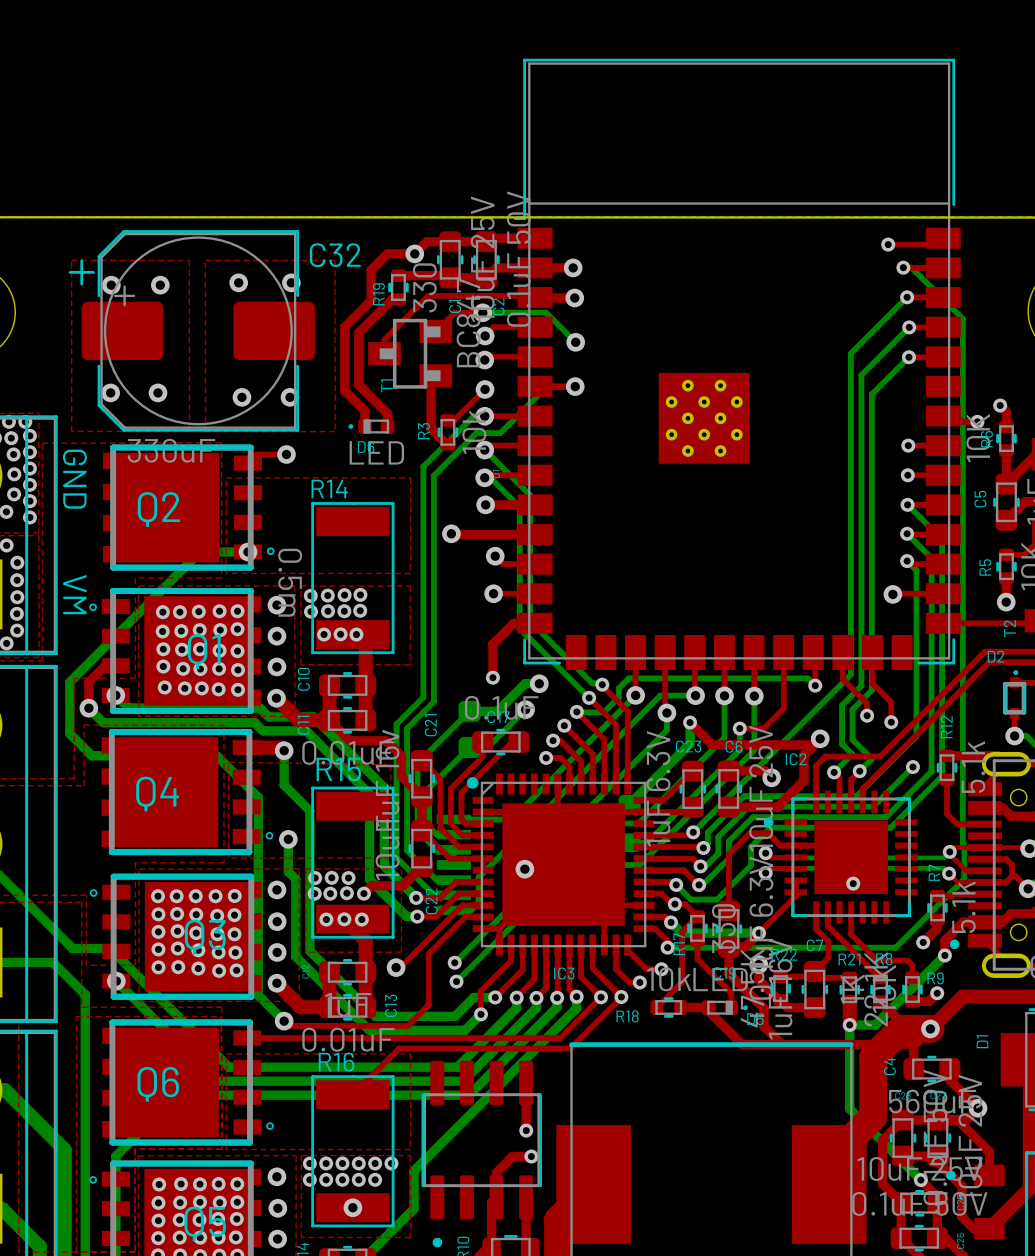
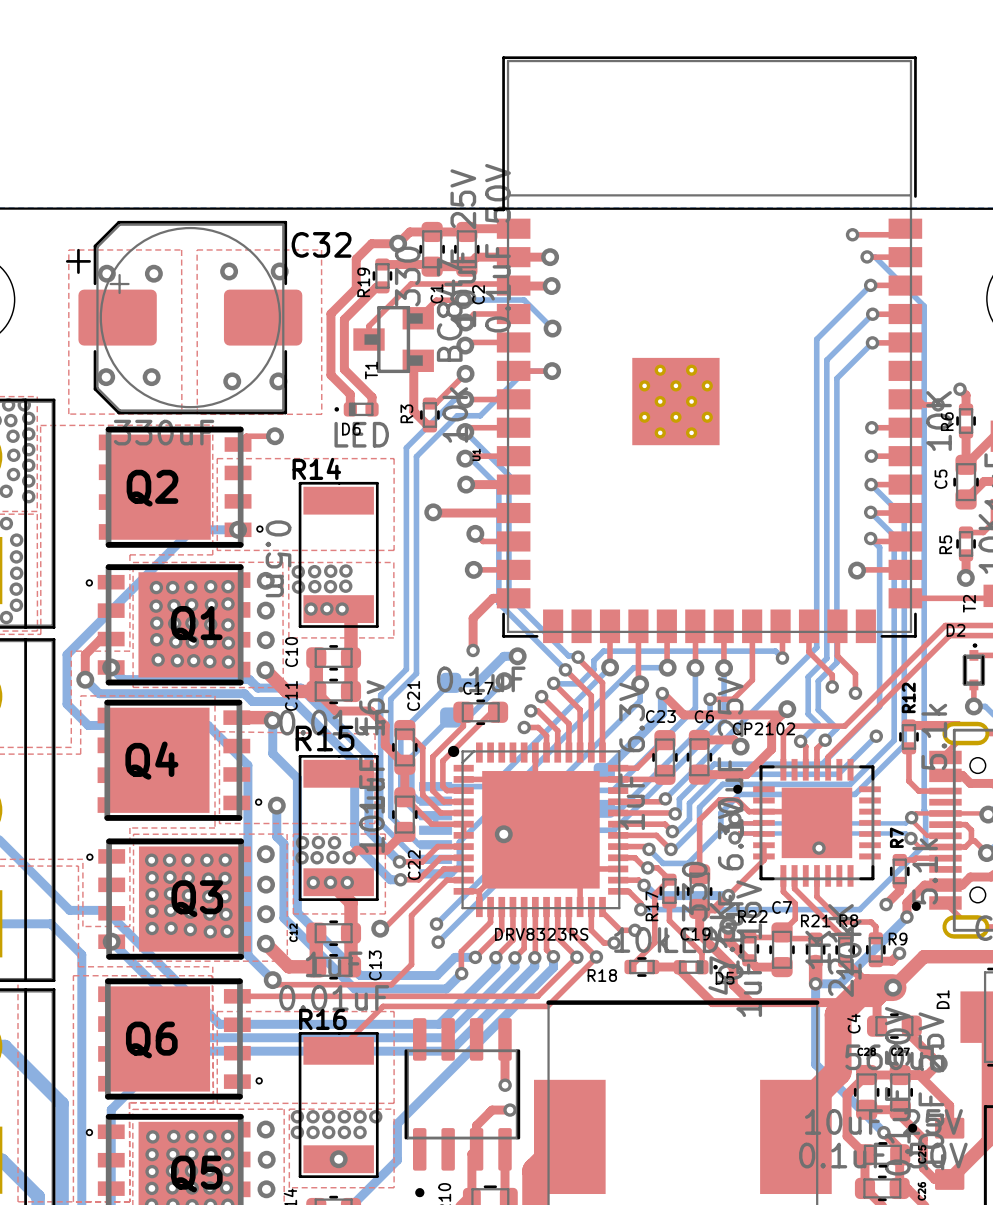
text: GND (74, 479) -> none
text: VM (74, 594) -> none
IC2 name: IC2 (796, 759) -> CP2102 (763, 728)
IC3 name: IC3 (564, 973) -> DRV8323RS (541, 934)

